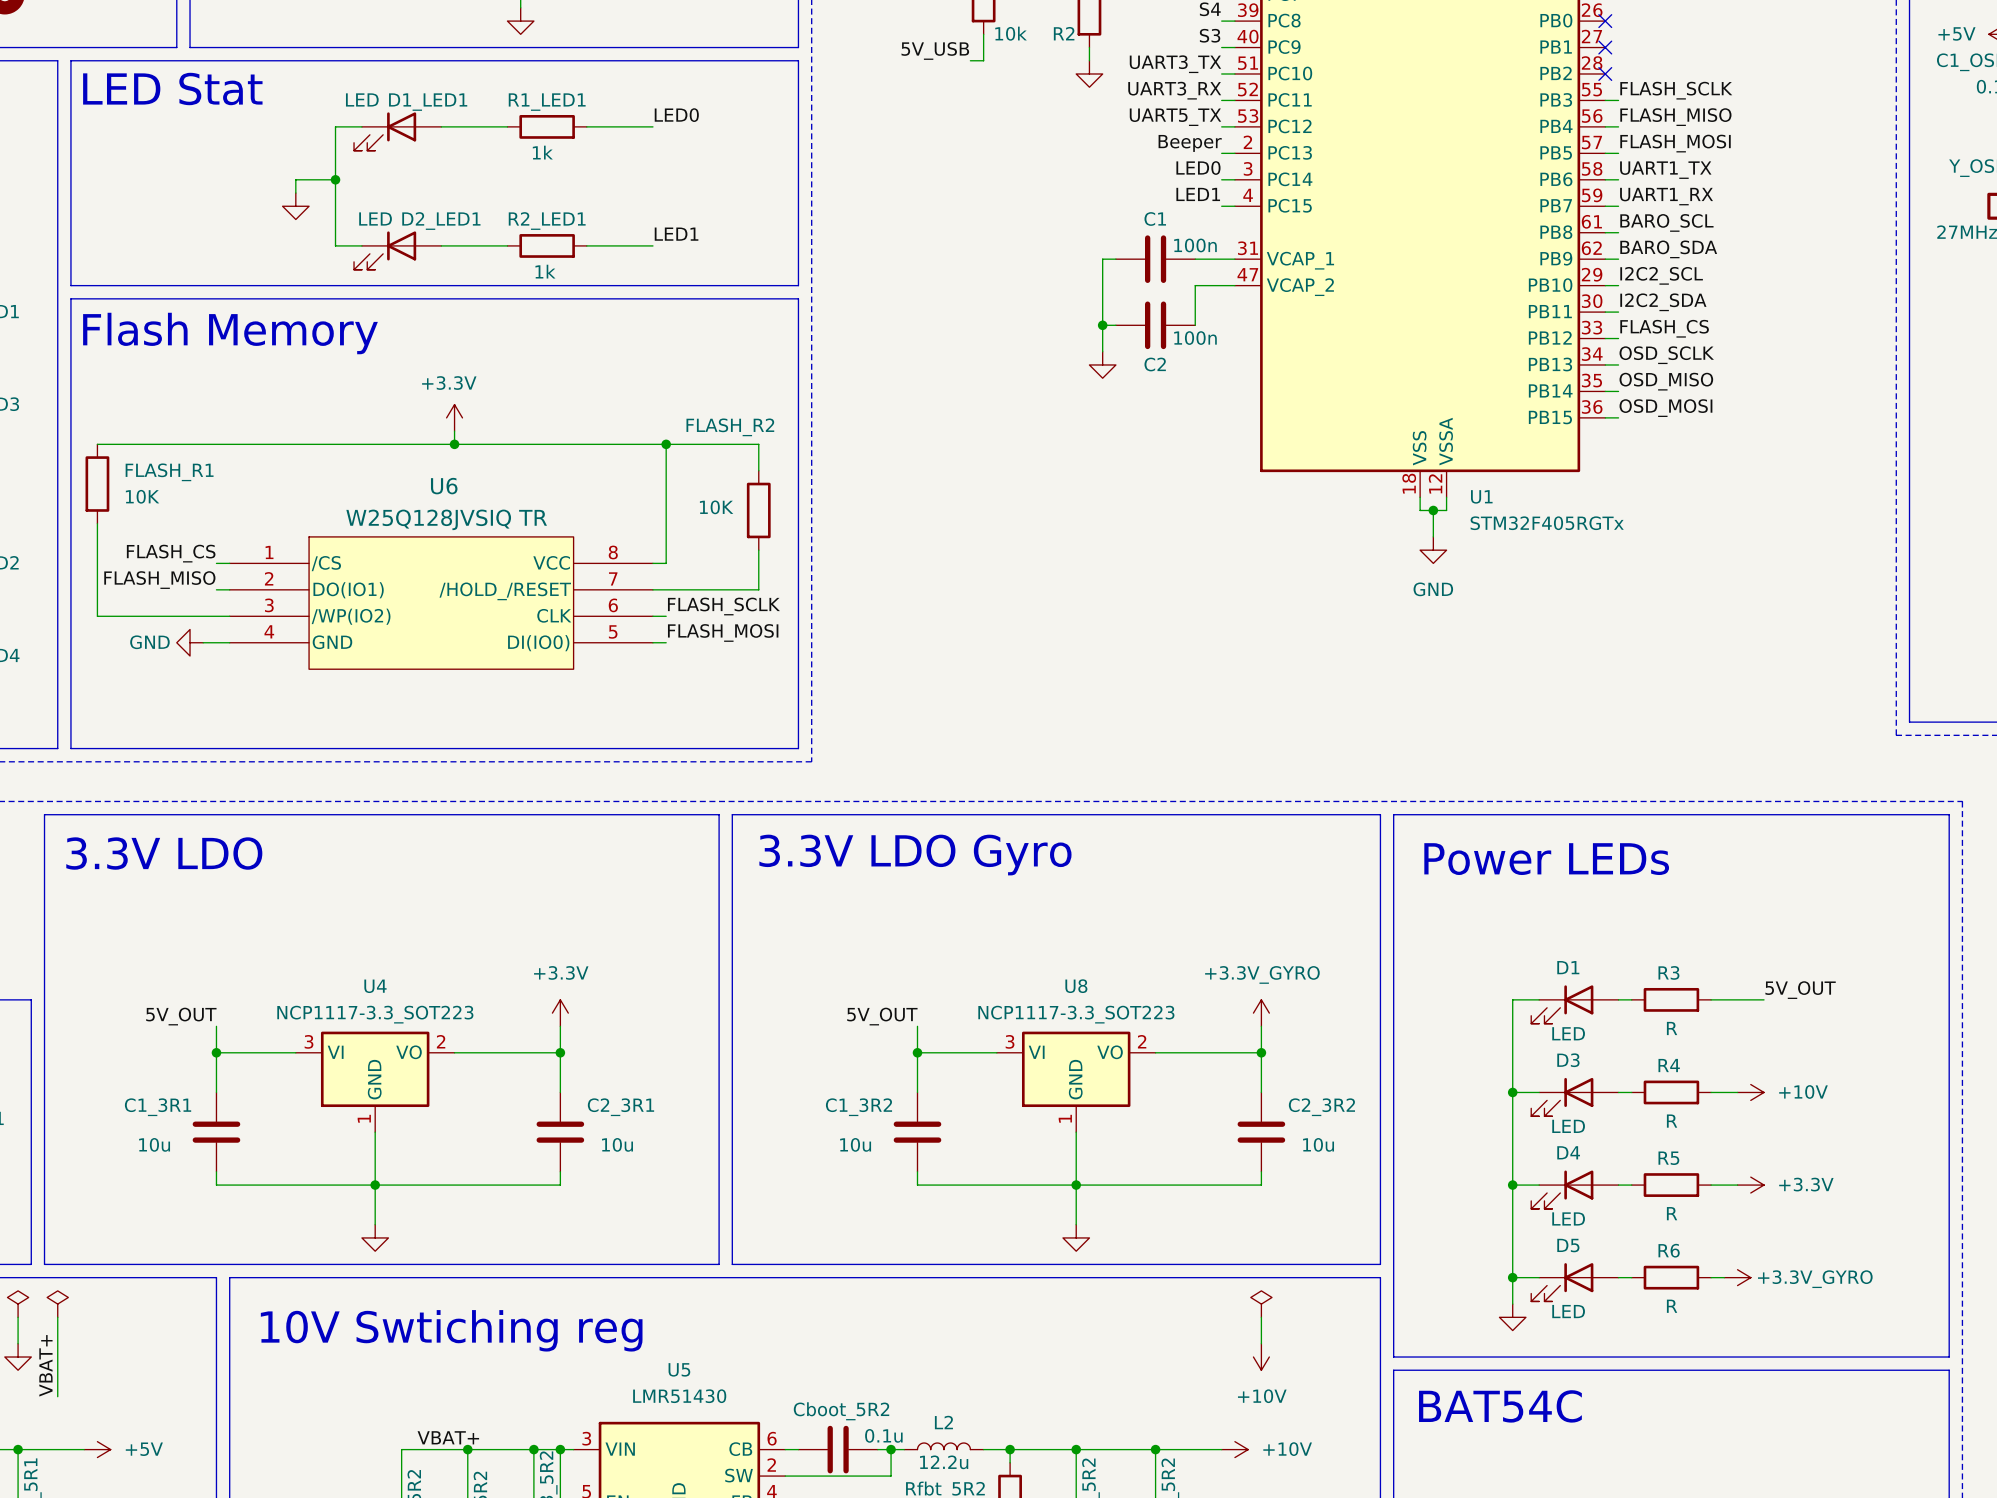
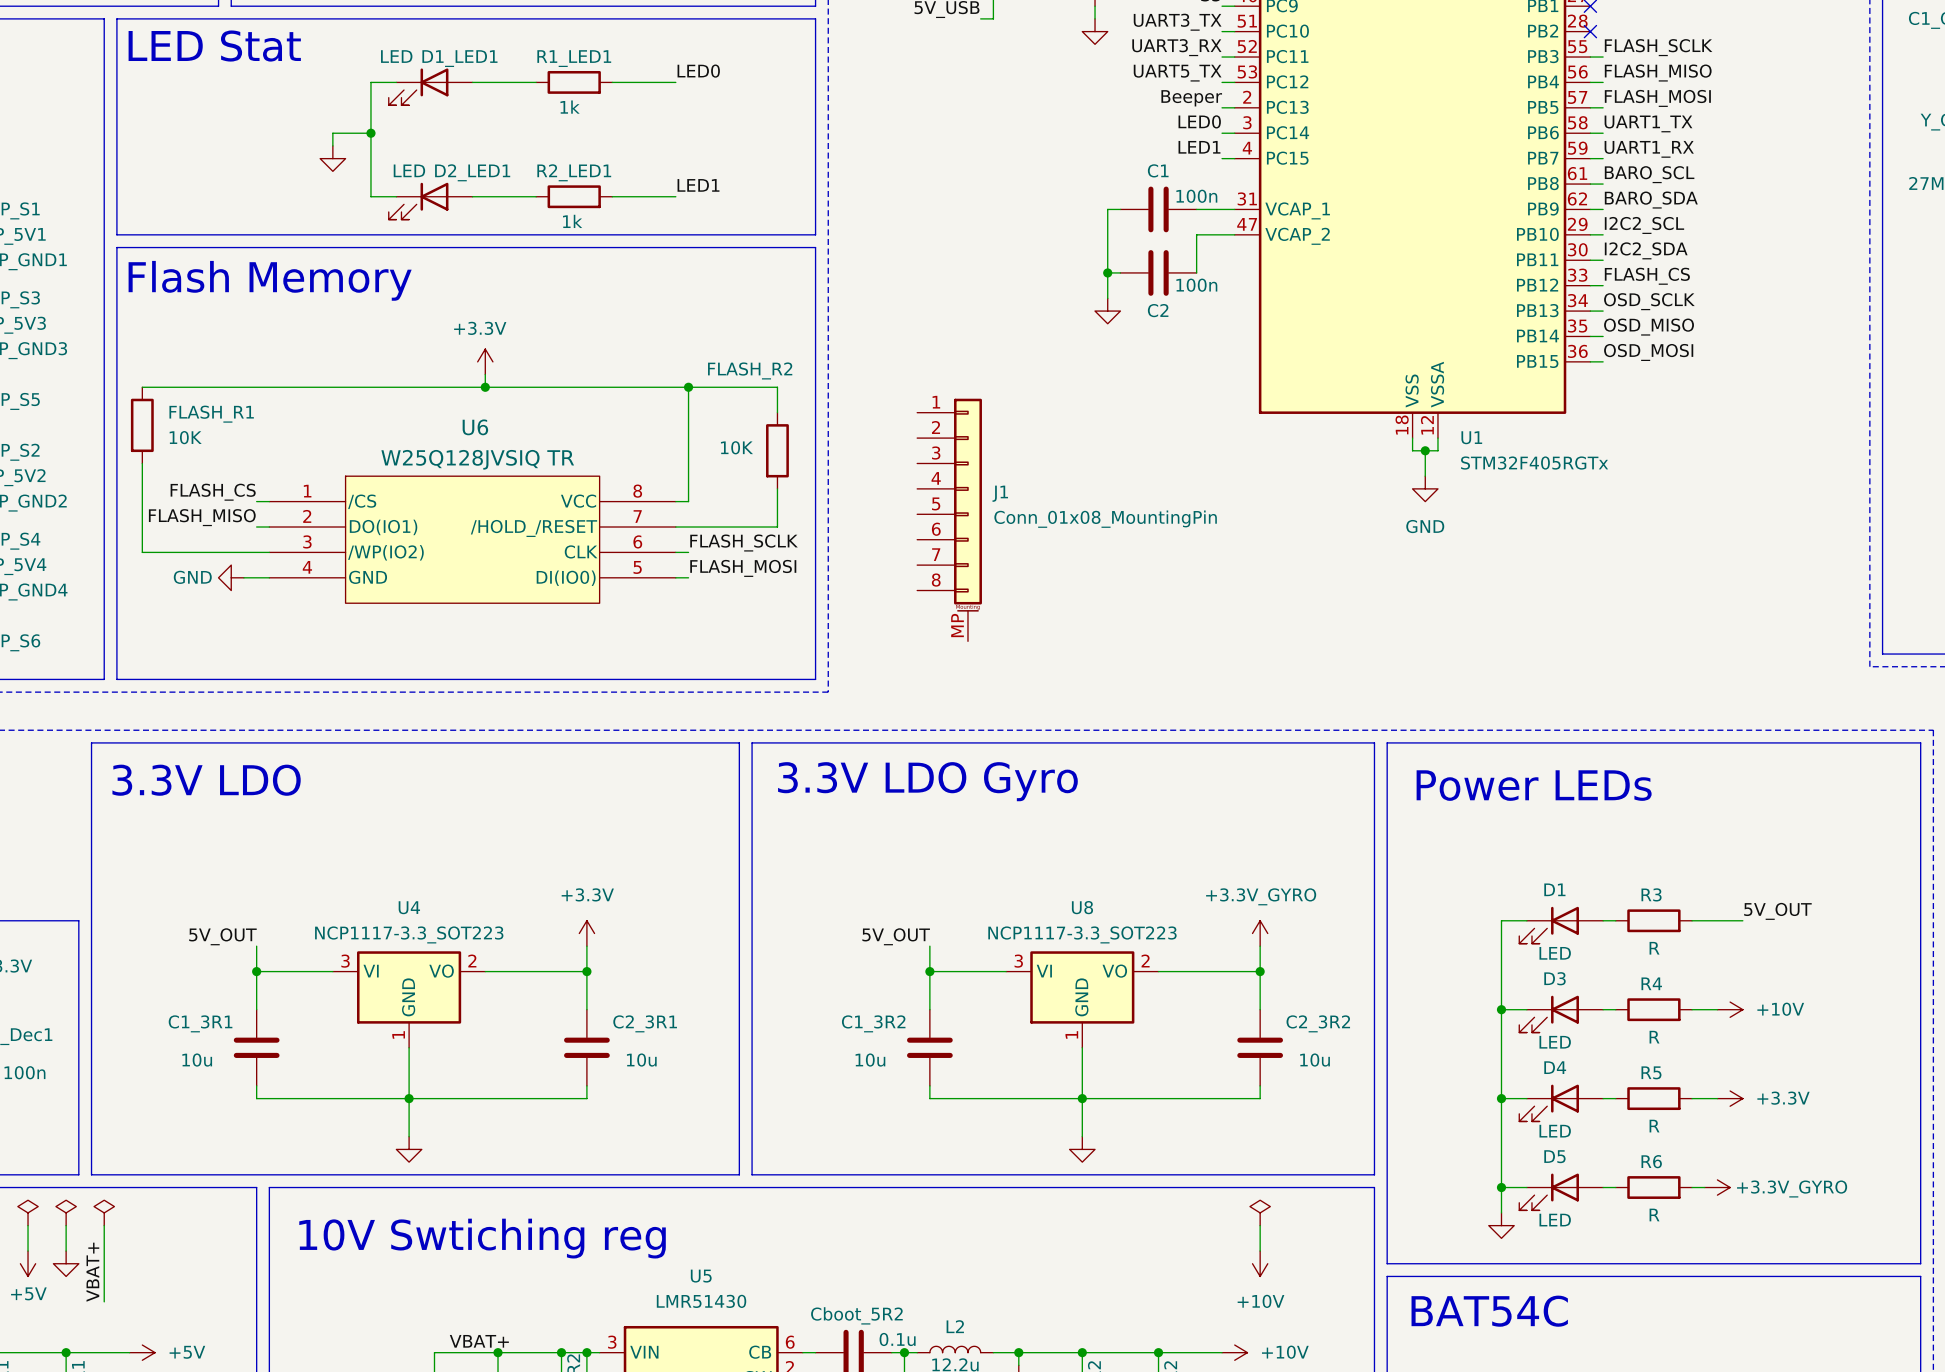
J1: none -> Conn_01x08_MountingPin (949, 520)

